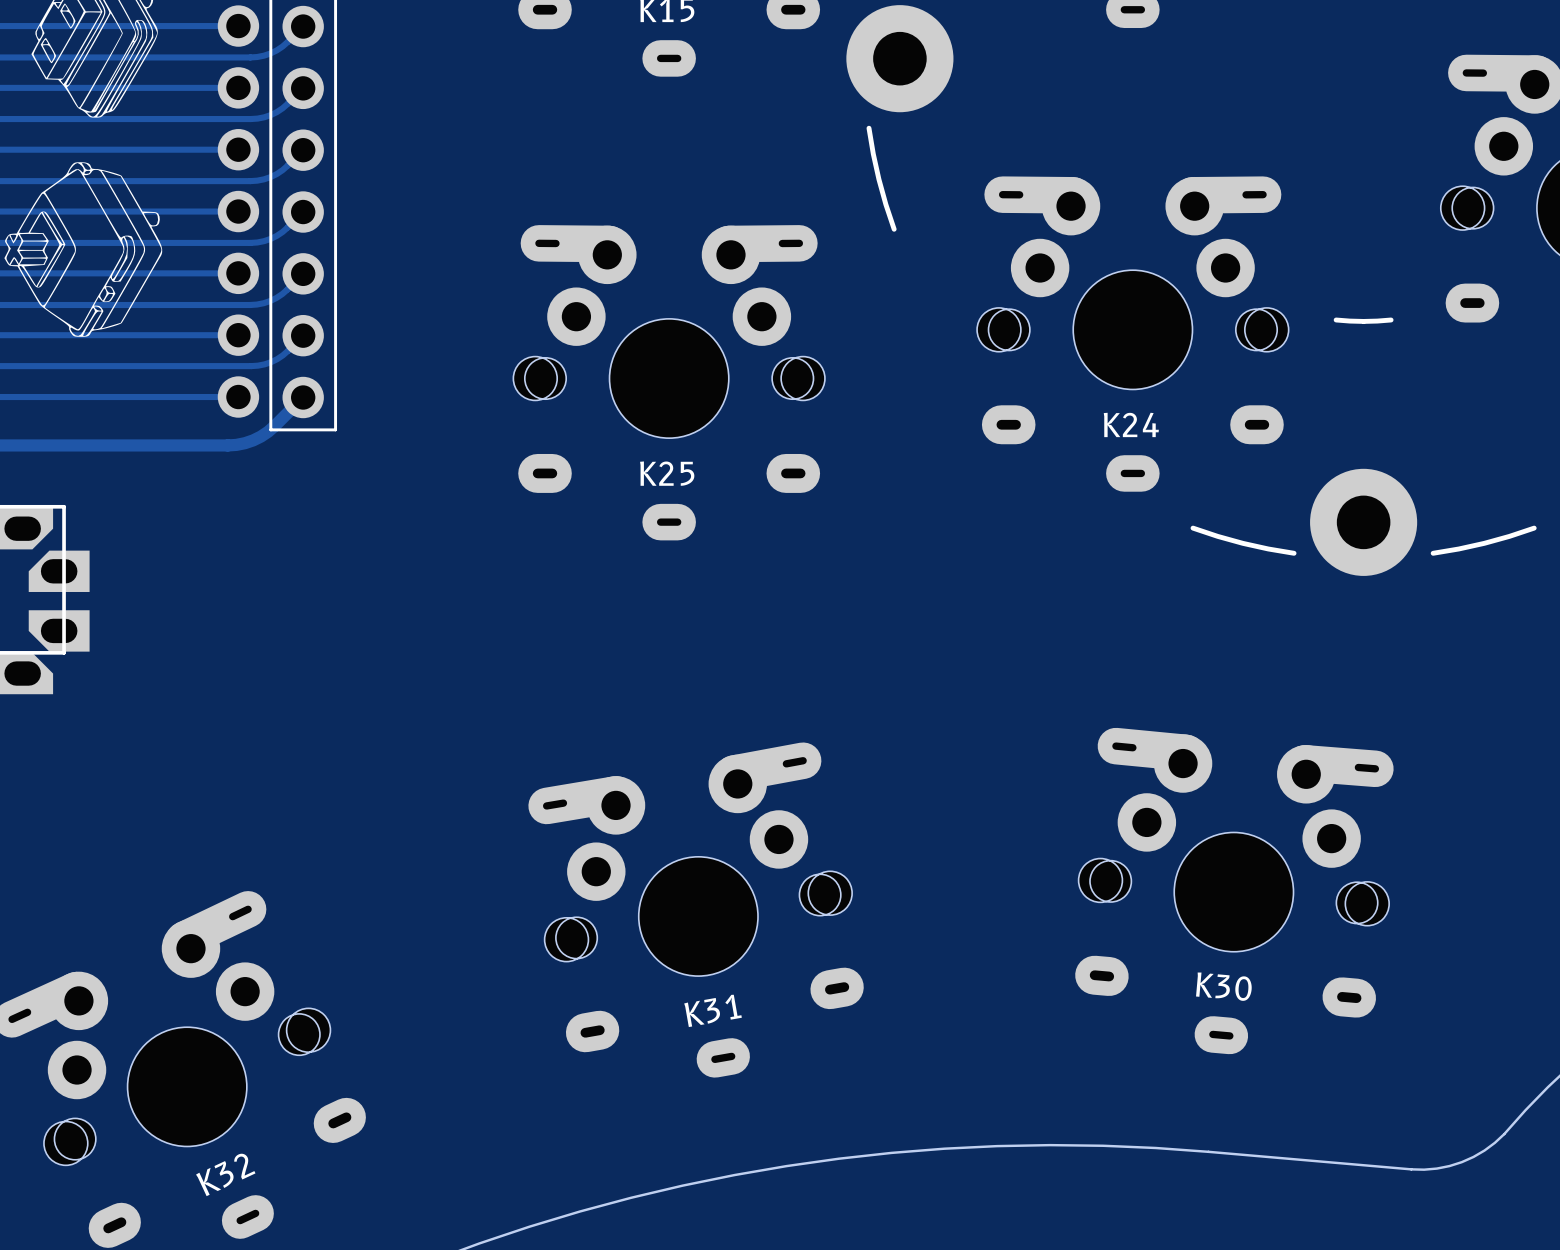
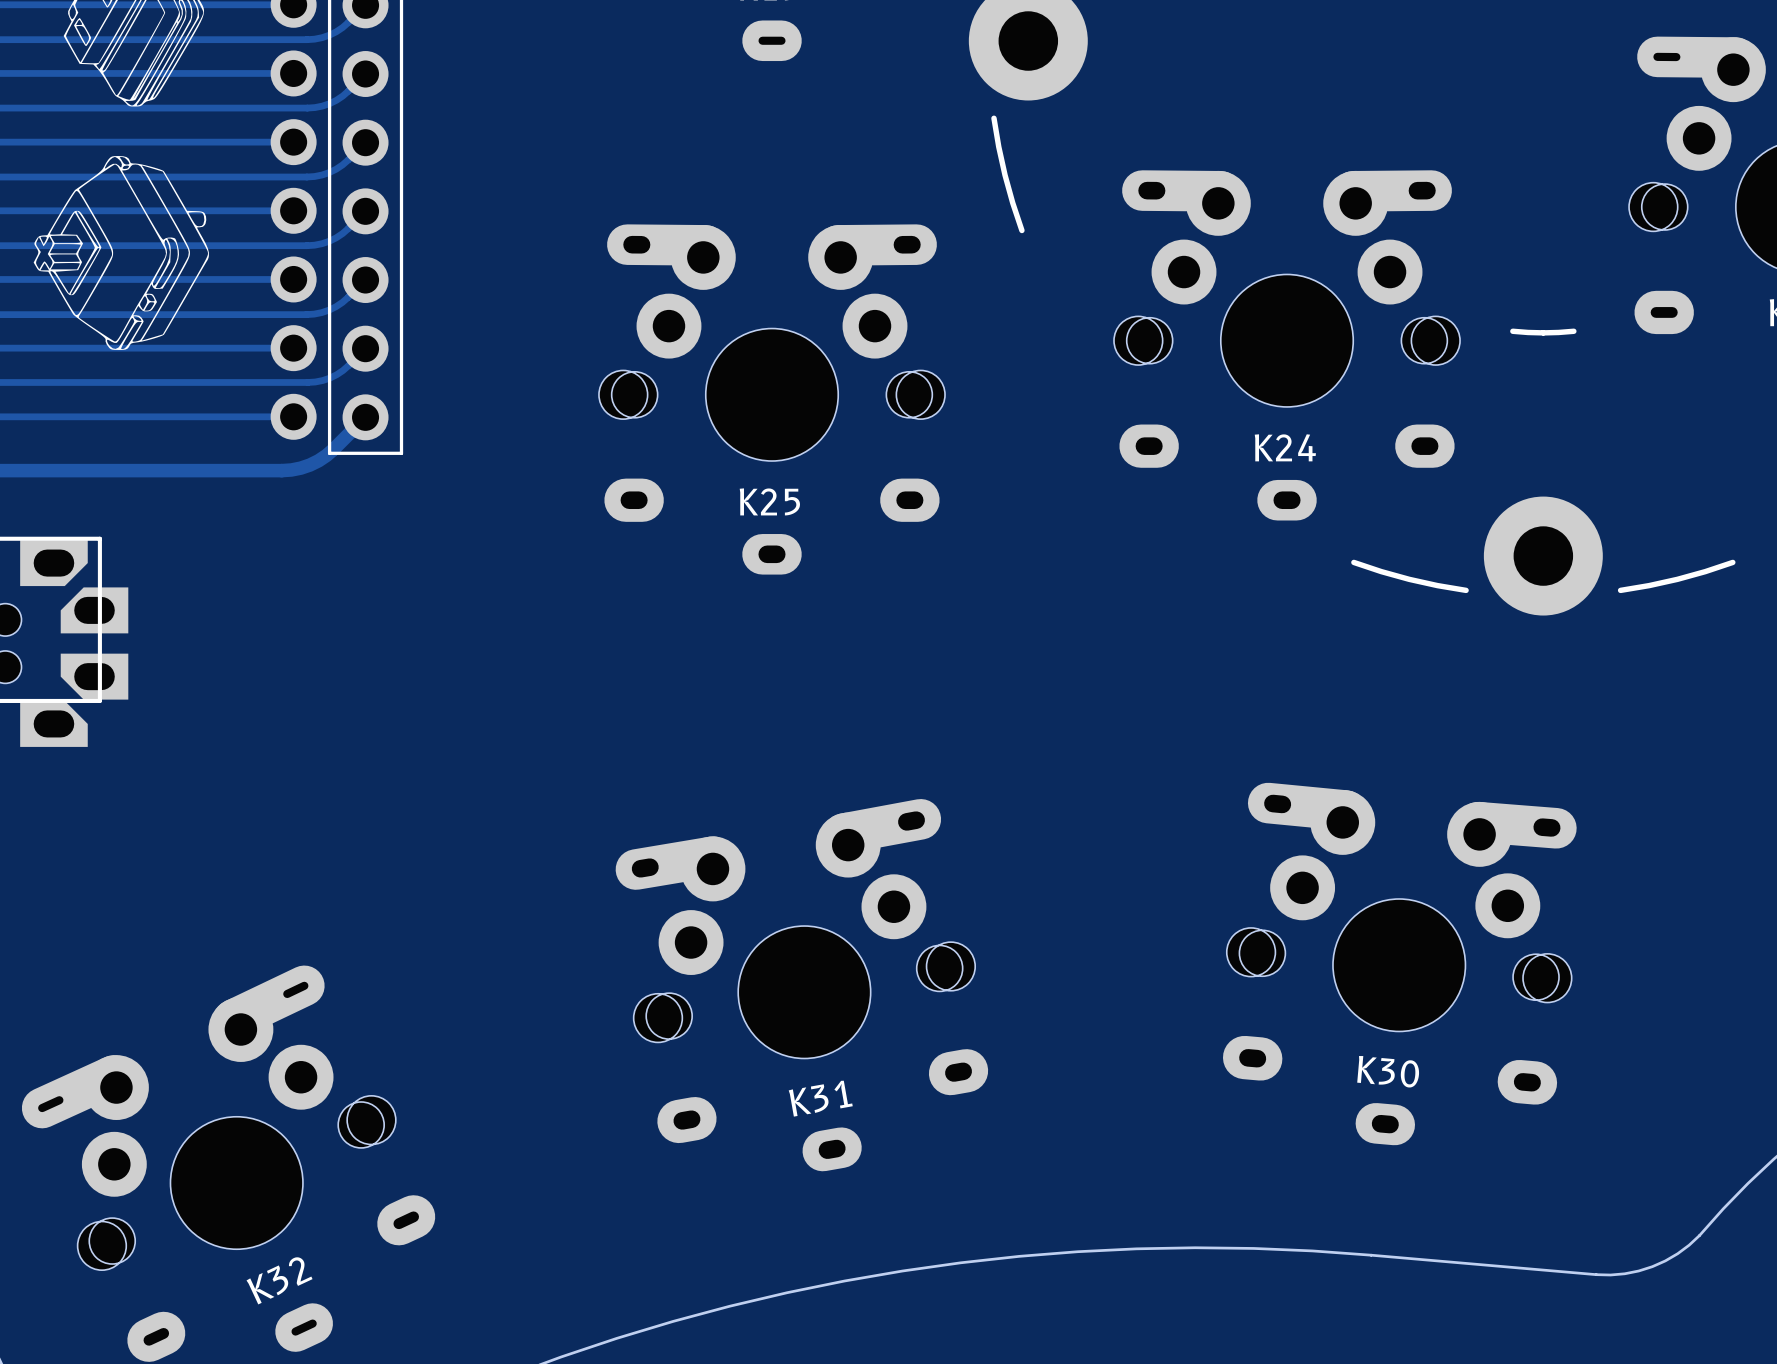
K24 footprint: [977, 176, 1289, 492] -> [1113, 170, 1461, 521]
K25 footprint: [513, 225, 825, 541] -> [598, 224, 946, 575]
K30 footprint: [1075, 727, 1394, 1055] -> [1222, 782, 1577, 1146]
K31 footprint: [528, 742, 864, 1078] -> [615, 799, 989, 1172]

